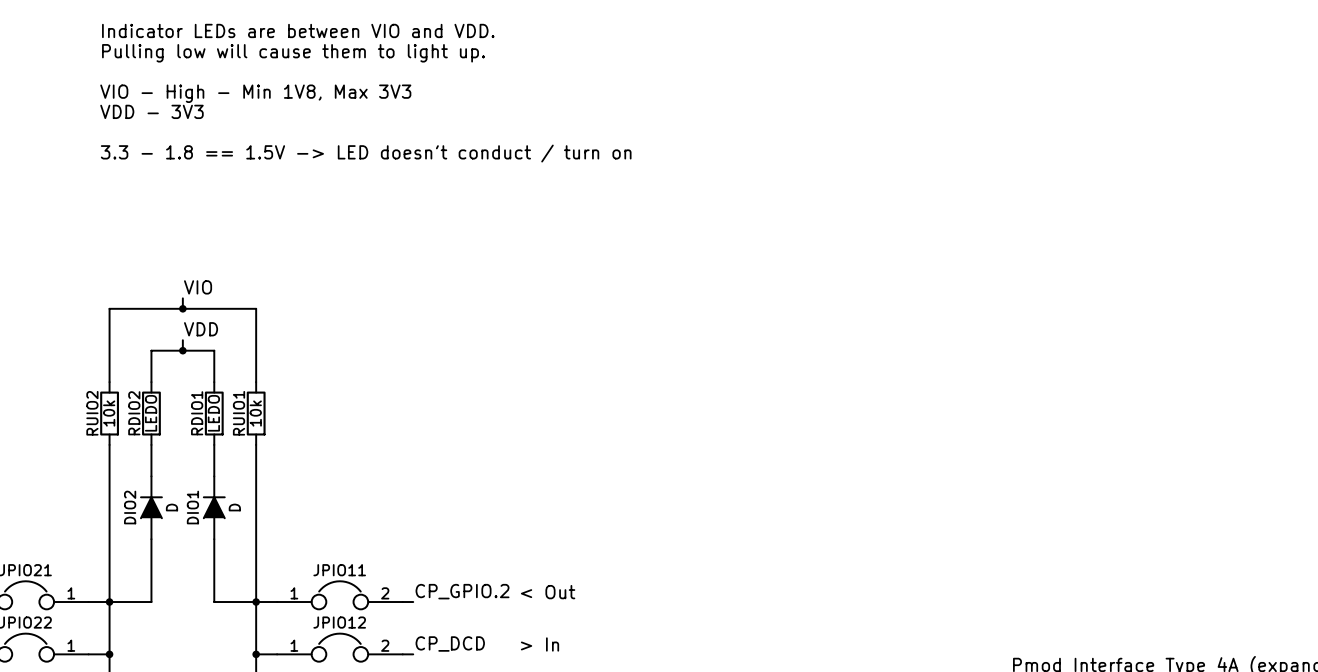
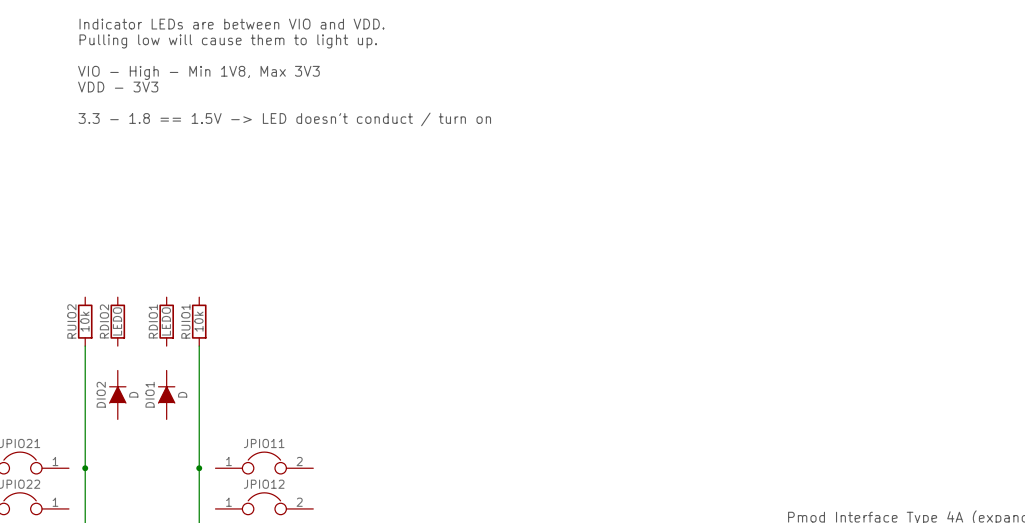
label: VIO (198, 287) -> none
wire: (182, 298) (182, 308) -> none
junction: (182, 308) -> none
label: VDD (201, 329) -> none
wire: (182, 340) (182, 350) -> none
junction: (182, 350) -> none
wire: (109, 382) (109, 308) (256, 308) (256, 382) -> none
wire: (151, 382) (151, 350) (214, 350) (214, 382) -> none
wire: (151, 444) (151, 476) -> none
wire: (214, 444) (214, 476) -> none
wire: (151, 539) (151, 602) (88, 602) -> none
wire: (214, 539) (214, 602) (277, 602) -> none
label: CP_GPIO.2 (462, 591) -> none
text: < Out (548, 592) -> none
wire: (402, 602) (413, 602) -> none
label: CP_DCD (450, 644) -> none
text: > In (540, 644) -> none
wire: (88, 654) (109, 654) -> none
junction: (109, 654) -> none
wire: (256, 654) (277, 654) -> none
junction: (256, 654) -> none
wire: (402, 654) (413, 654) -> none

